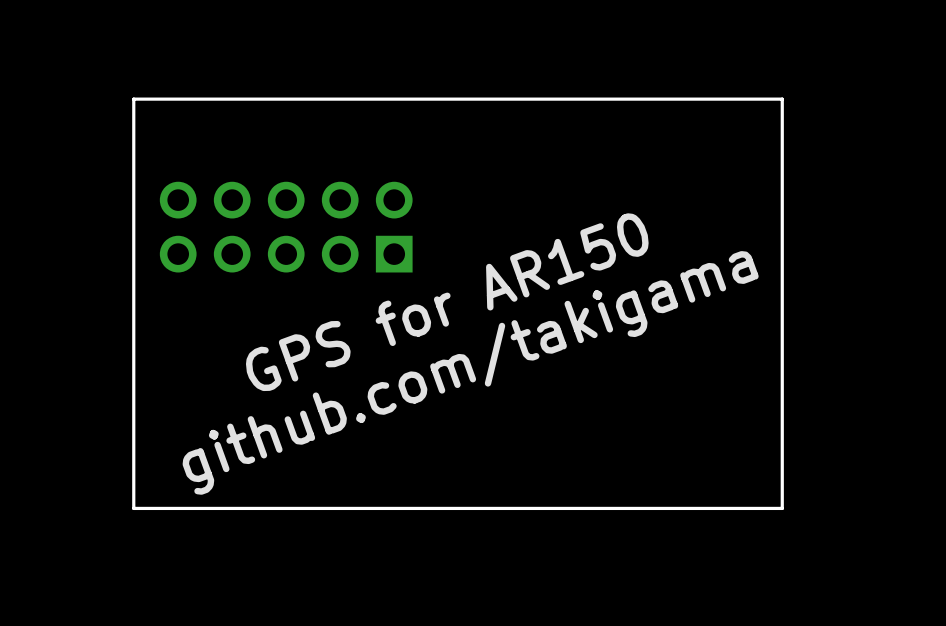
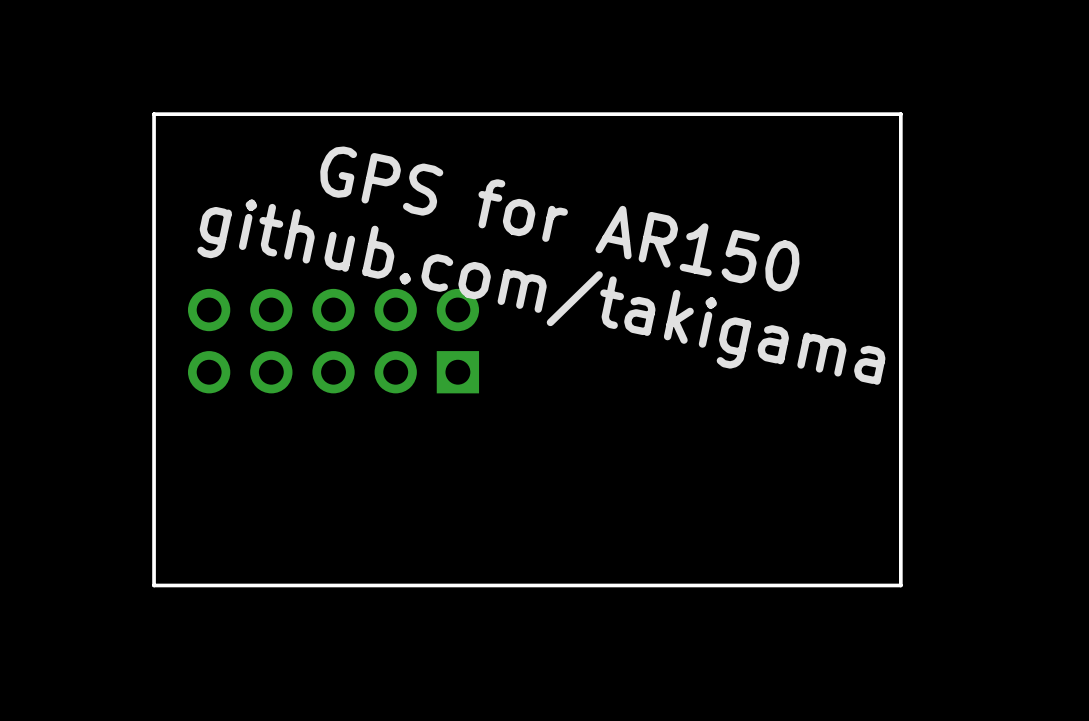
part position: (286, 227) -> (333, 341)
text rotation: 0° (447, 302) -> 32° clockwise (559, 219)
text rotation: 0° (470, 372) -> 32° clockwise (541, 292)

